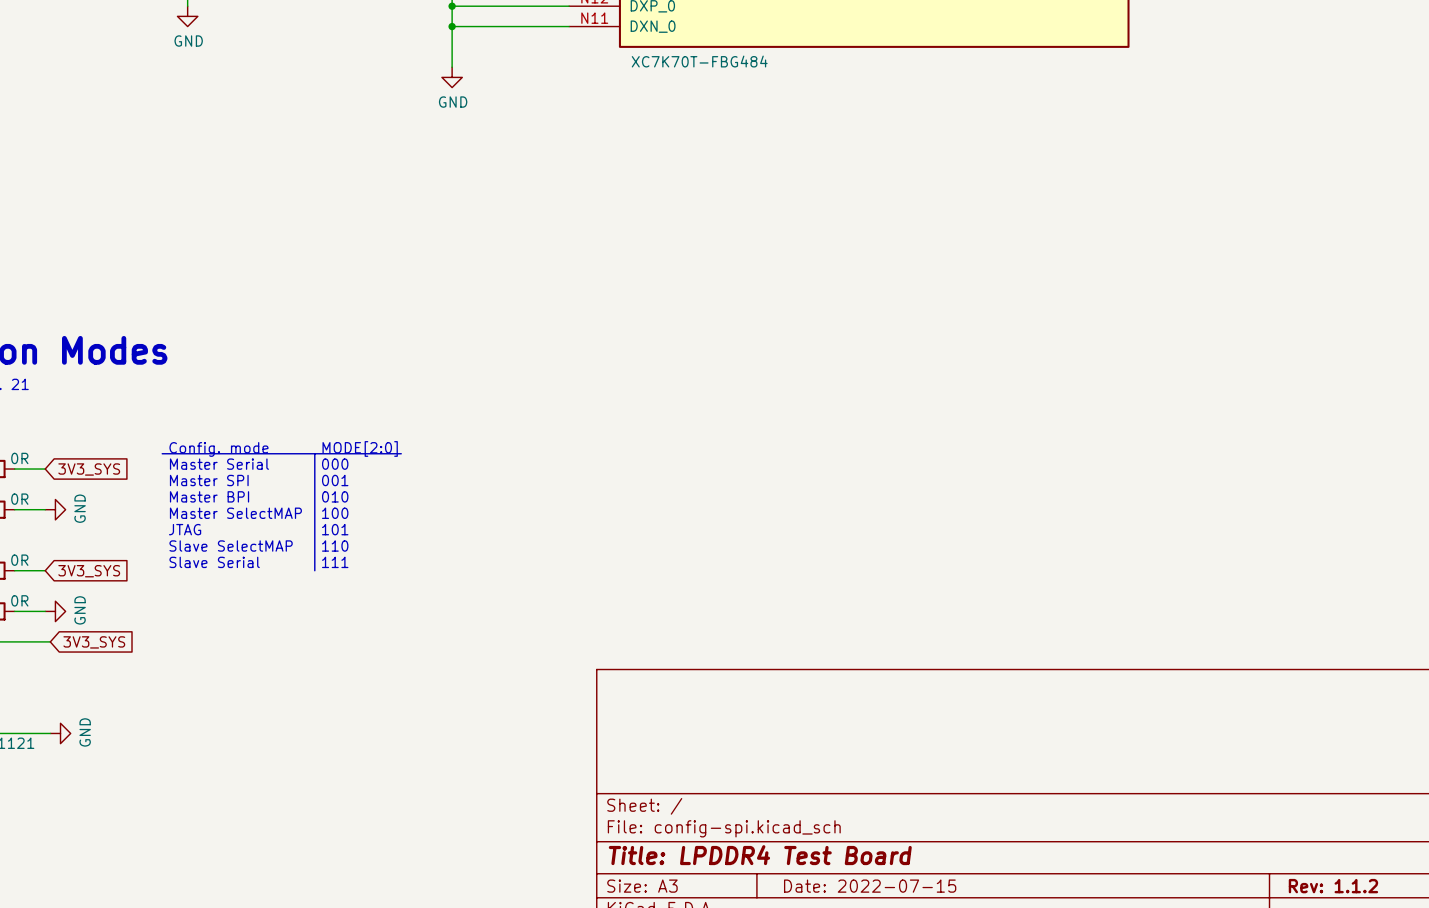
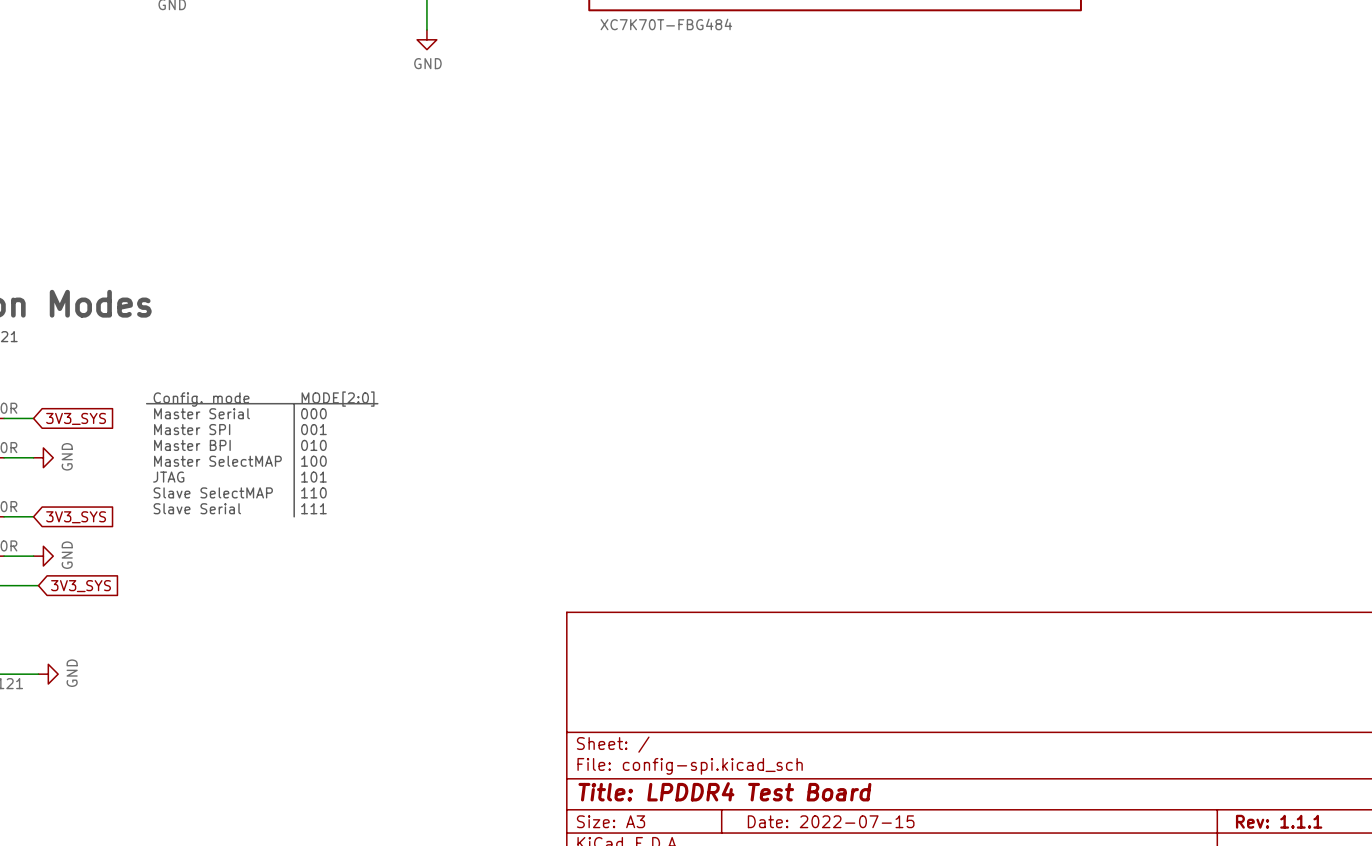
title block: Rev: 1.1.2 (1333, 886) -> Rev: 1.1.1 (1279, 821)

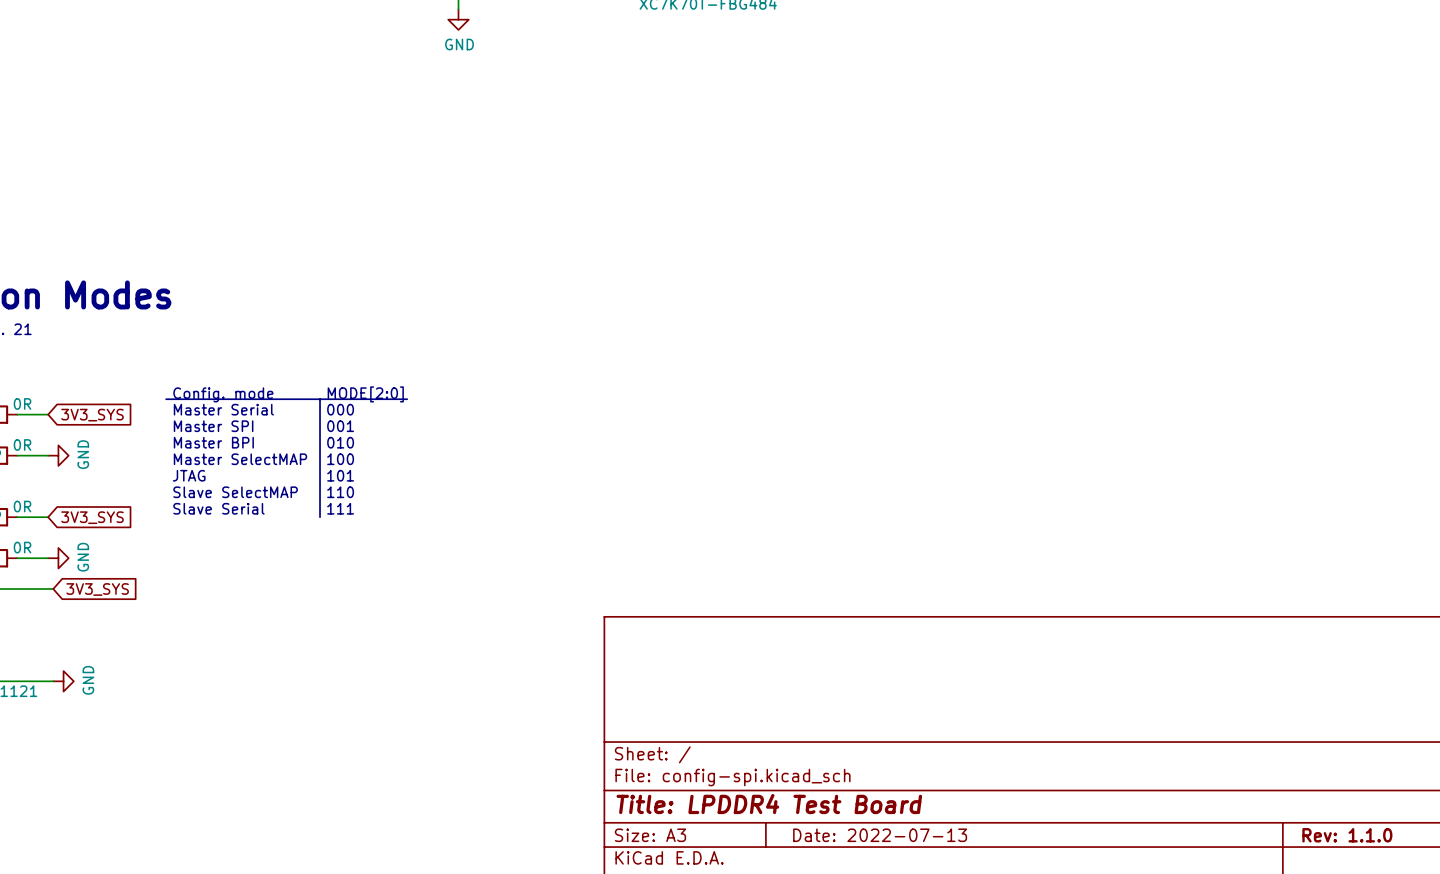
title block: Date: 2022-07-15 (831, 821) -> Date: 2022-07-13 (880, 835)
title block: Rev: 1.1.1 (1279, 821) -> Rev: 1.1.0 (1347, 835)

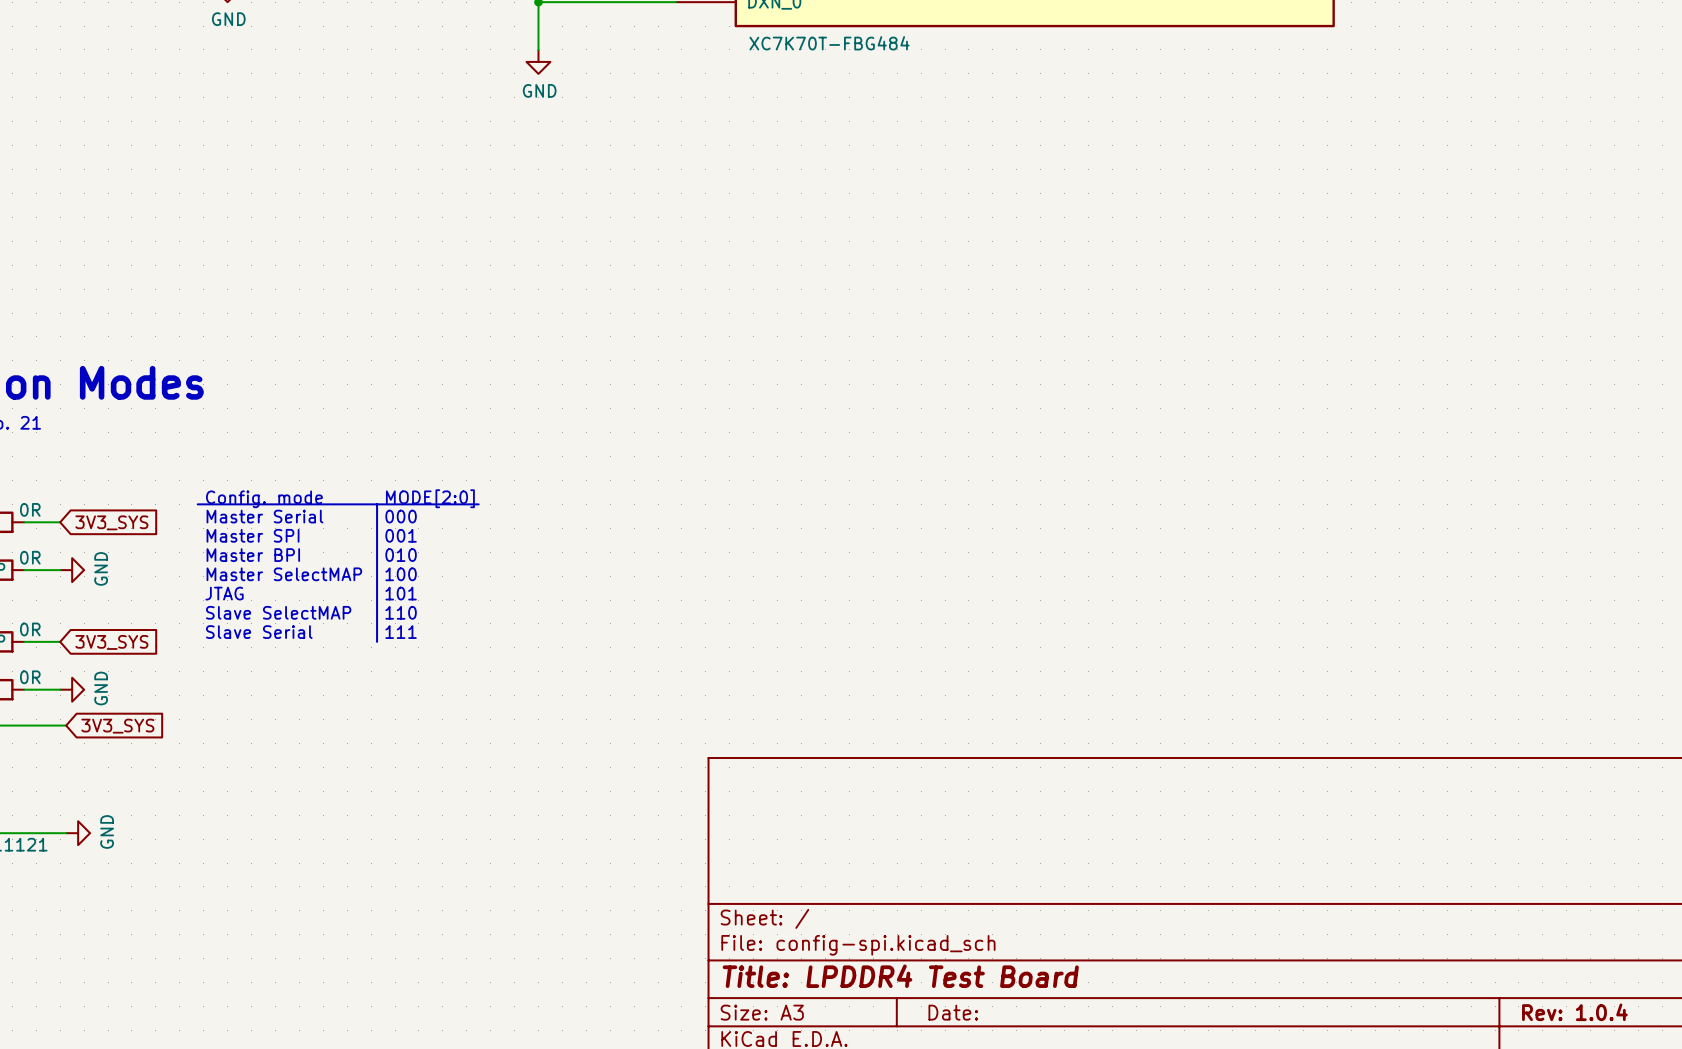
title block: Date: 2022-07-13 (880, 835) -> Date: (953, 1012)
title block: Rev: 1.1.0 (1347, 835) -> Rev: 1.0.4 (1574, 1012)

